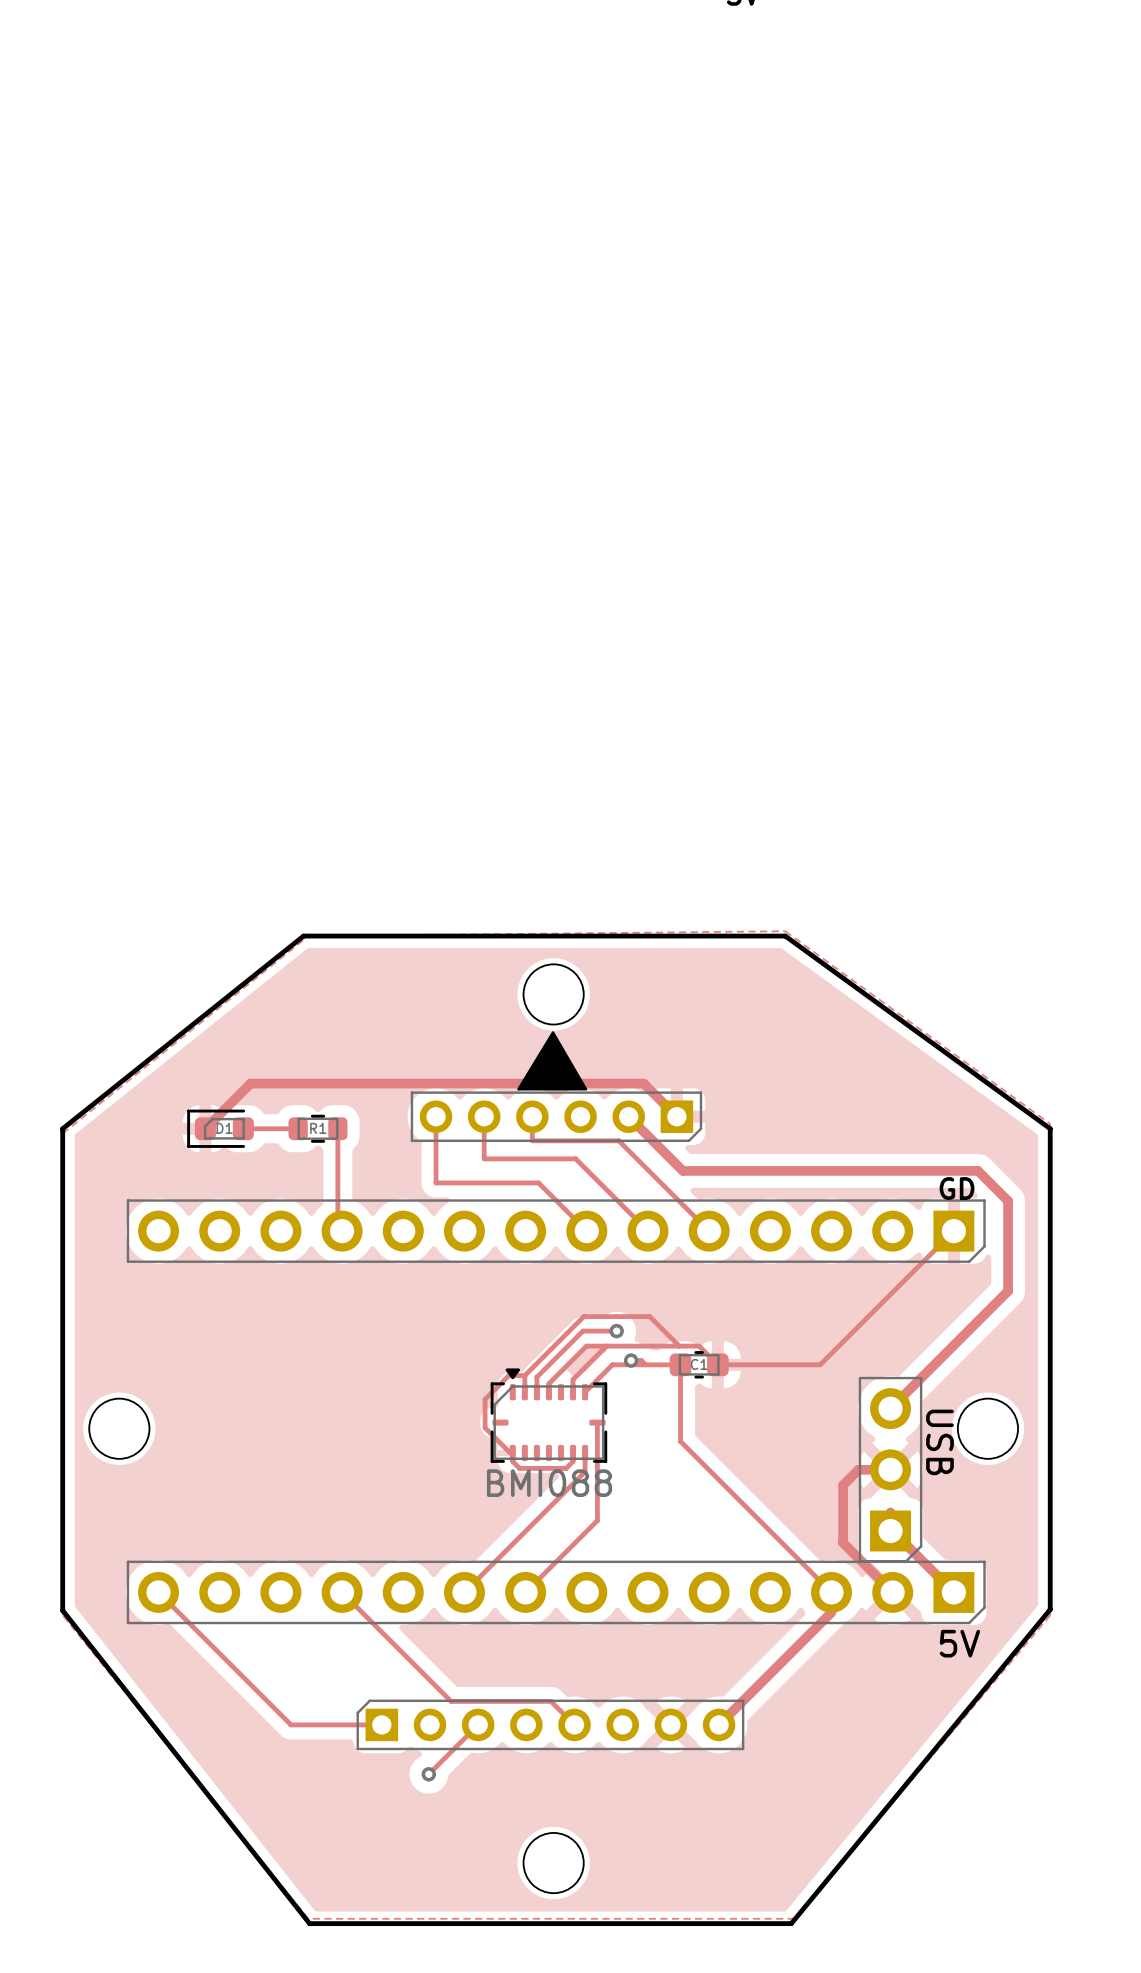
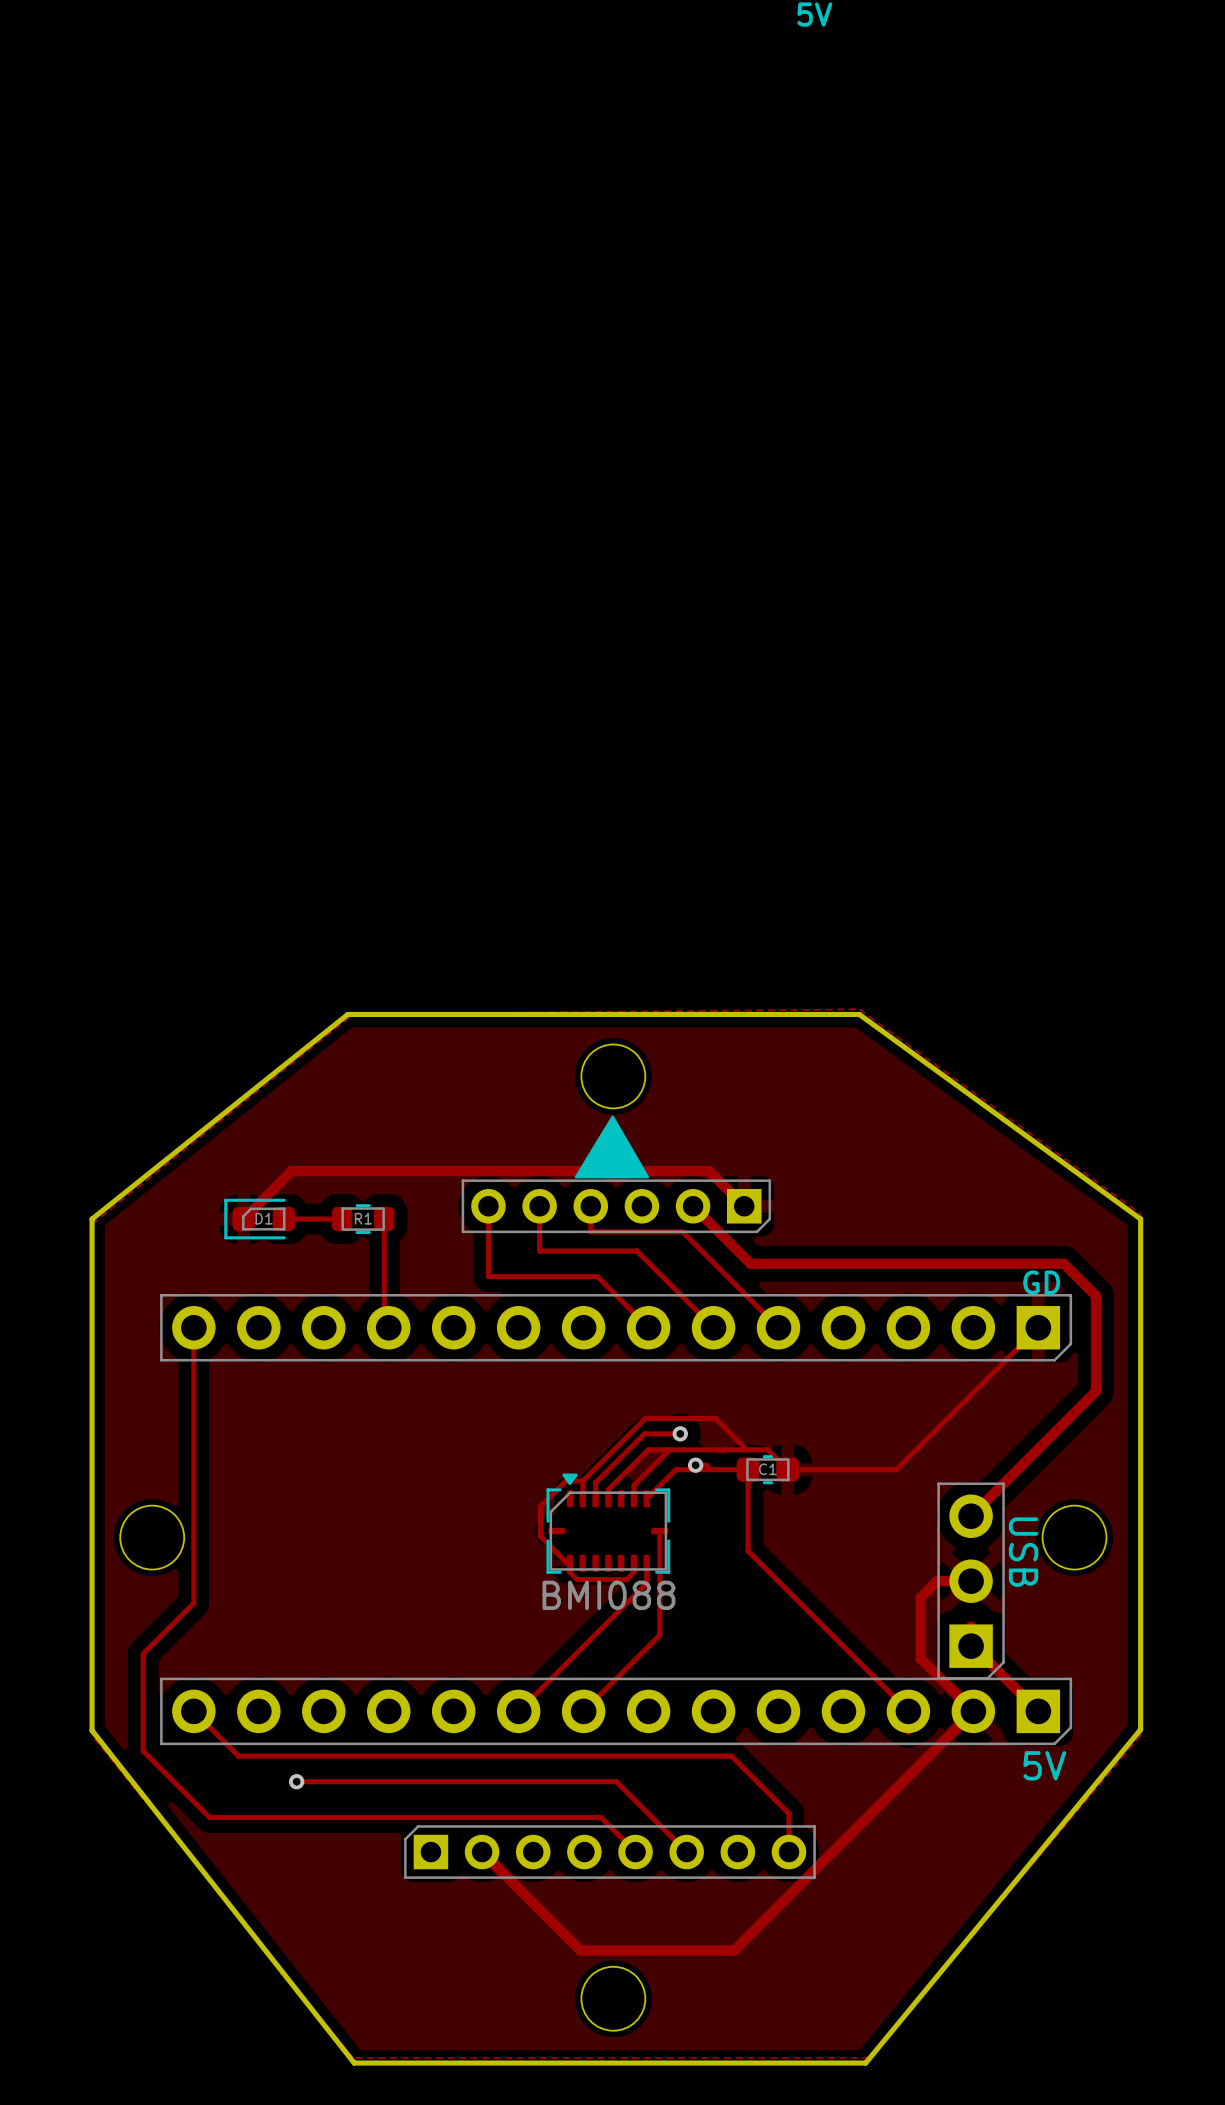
track: (342, 1592) (451, 1701) (551, 1701) -> (193, 1327) (193, 1603) (143, 1653) (143, 1751) (209, 1817) (601, 1817) (610, 1827)
track: none -> (973, 1711) (734, 1950) (580, 1950) (482, 1852)
track: (831, 1612) (719, 1724) -> none
track: (200, 1634) (291, 1724) (381, 1724) -> (238, 1756) (731, 1756) (788, 1813) (788, 1852)
track: none -> (296, 1781) (616, 1781) (686, 1852)
via: none -> (296, 1781)
track: (478, 1724) (428, 1774) -> none
via: (428, 1774) -> none

